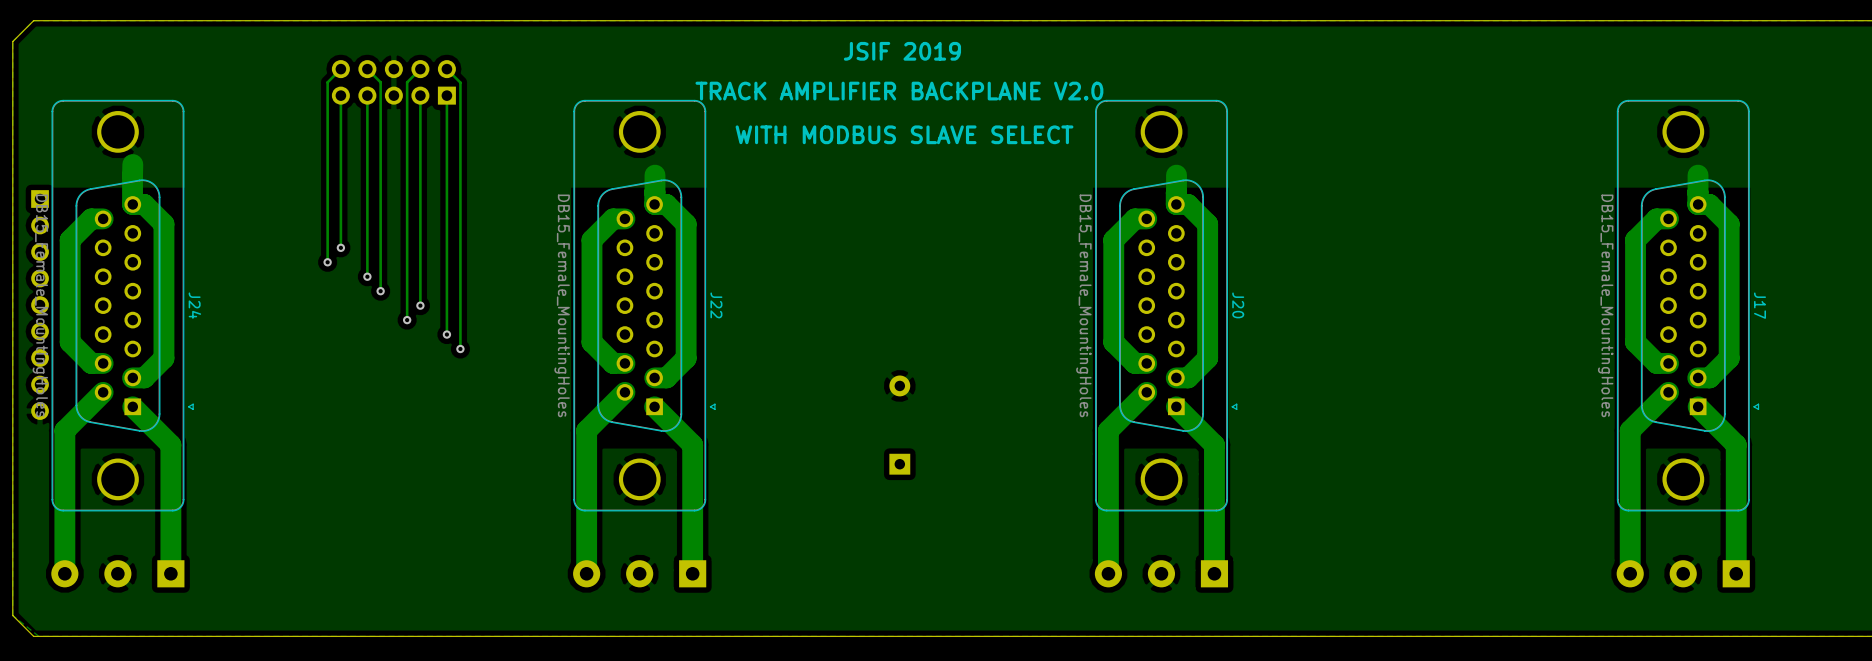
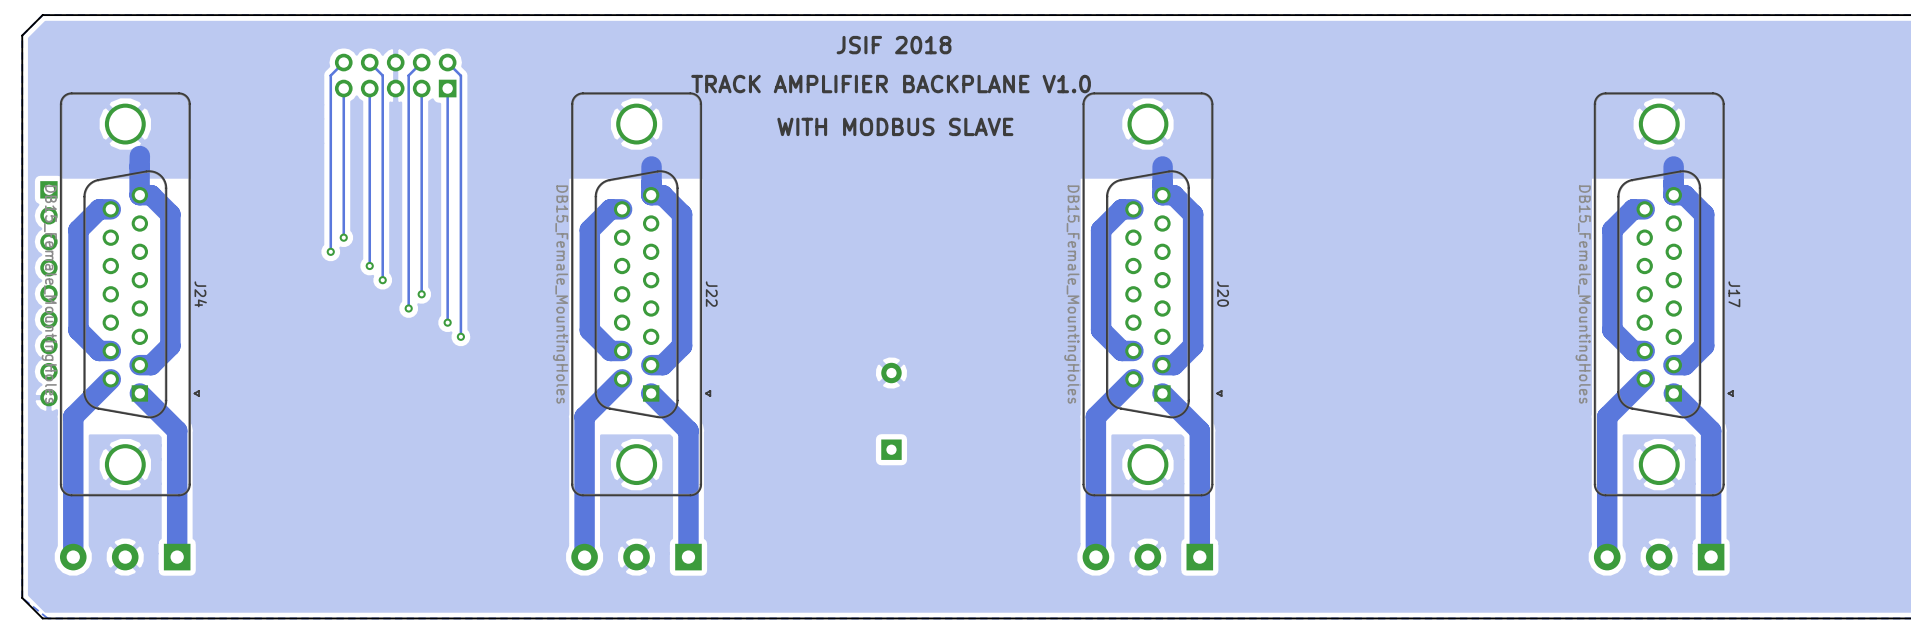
text: JSIF 2019 (902, 51) -> JSIF 2018 (894, 45)
text: TRACK AMPLIFIER BACKPLANE V2.0 (899, 91) -> TRACK AMPLIFIER BACKPLANE V1.0 (891, 84)
text: WITH MODBUS SLAVE SELECT (904, 134) -> WITH MODBUS SLAVE (895, 126)

